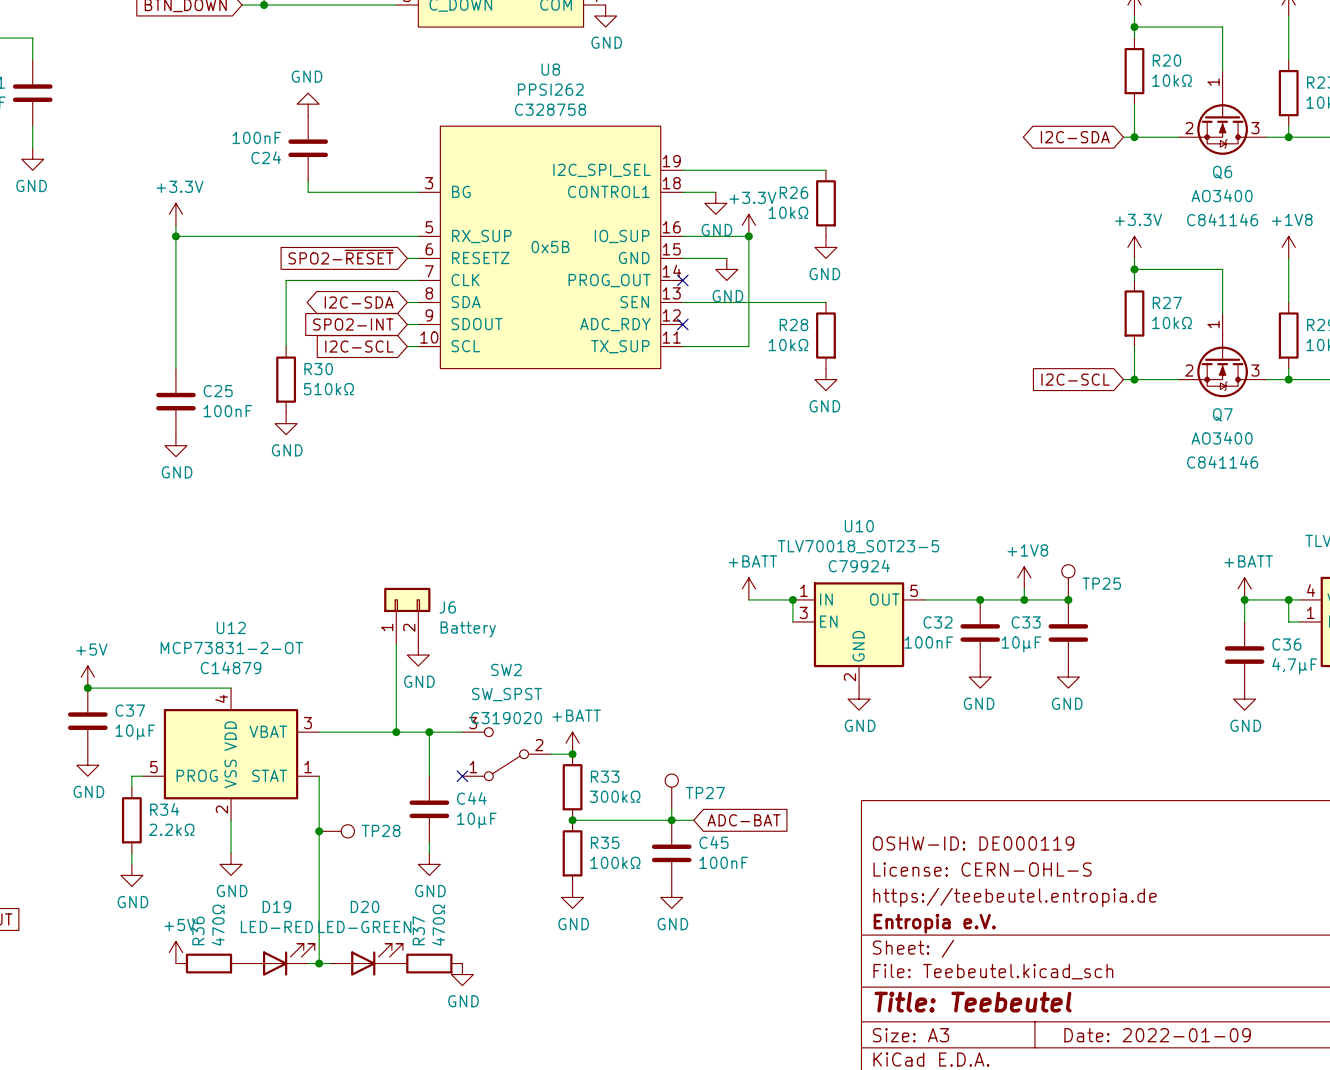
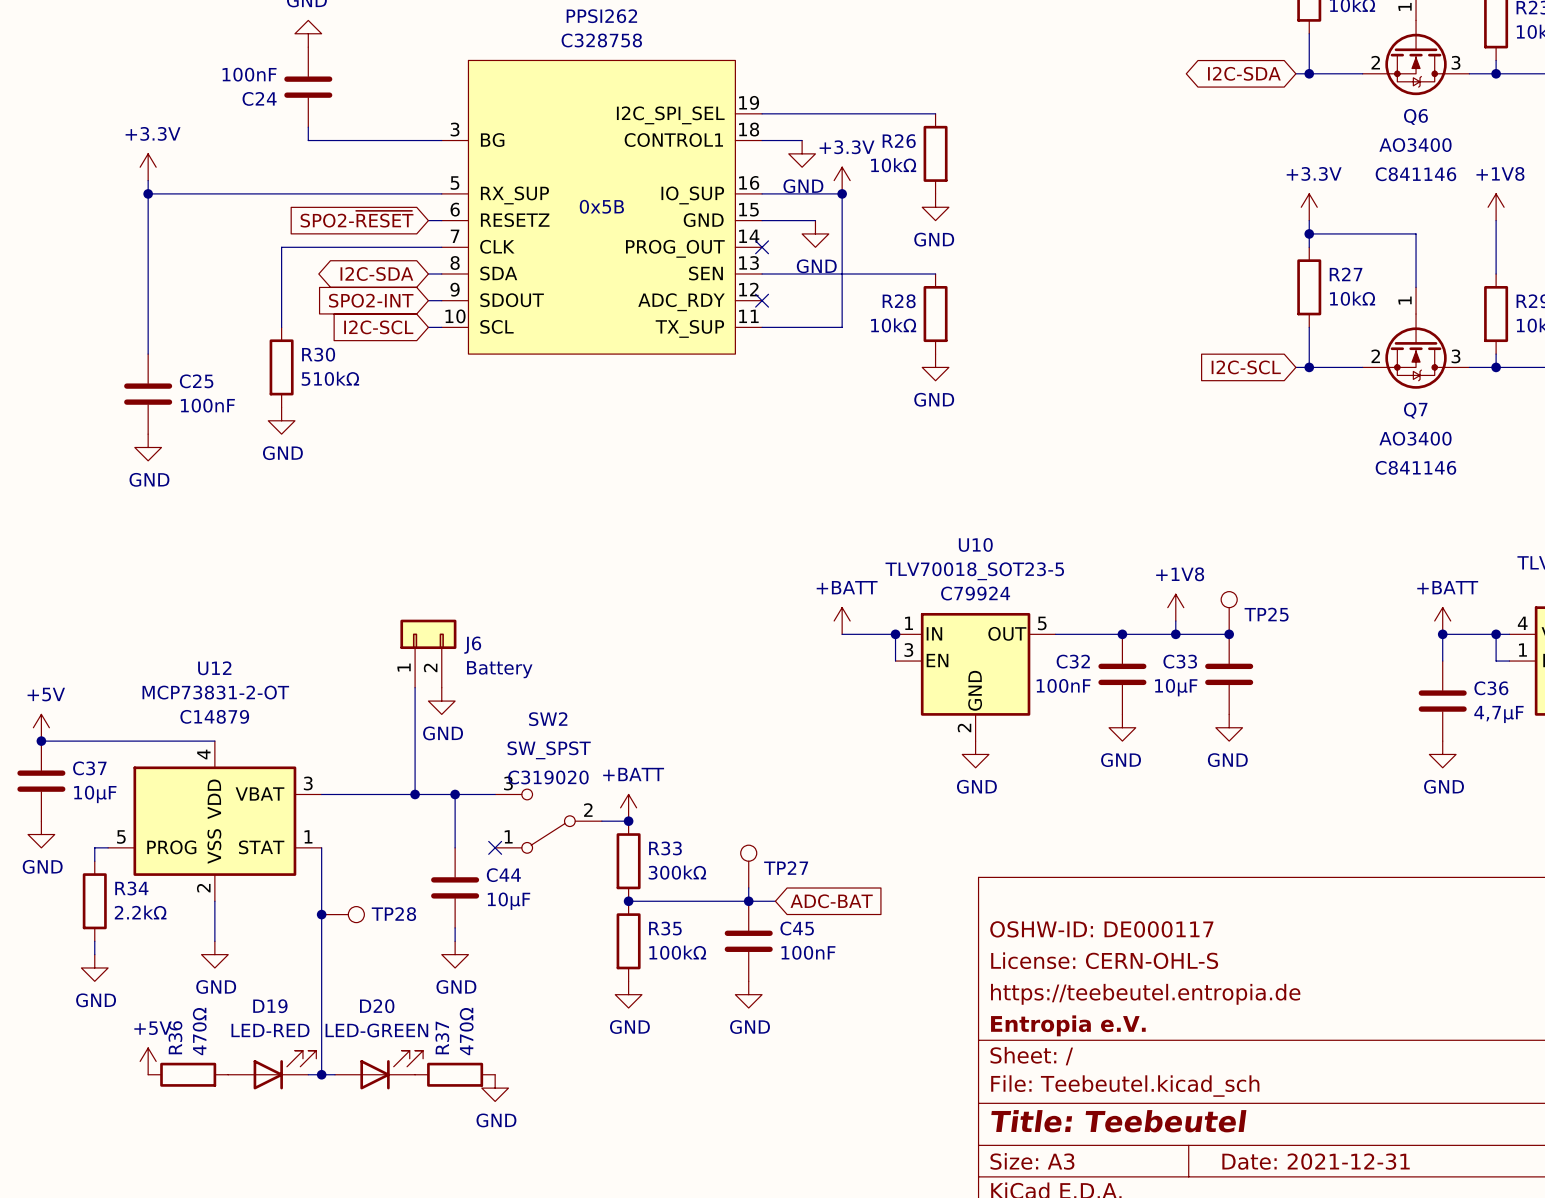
title block: OSHW-ID: DE000119 (973, 843) -> OSHW-ID: DE000117 (1101, 929)
title block: Date: 2022-01-09 (1157, 1035) -> Date: 2021-12-31 (1316, 1161)

